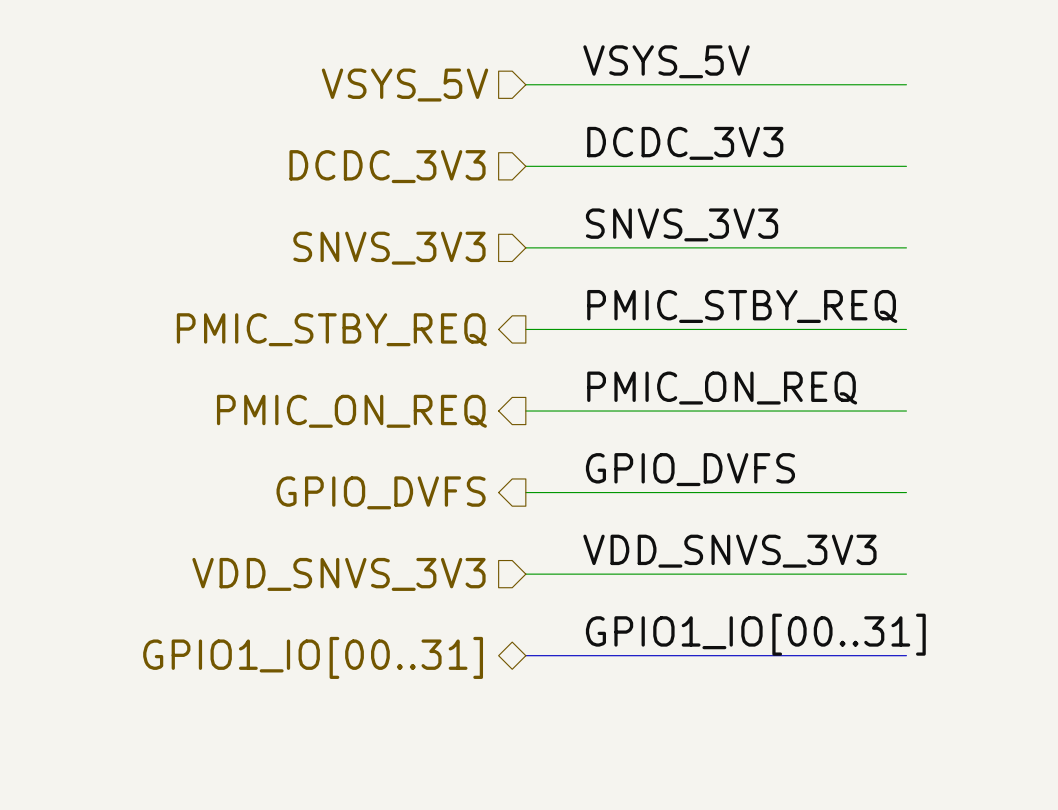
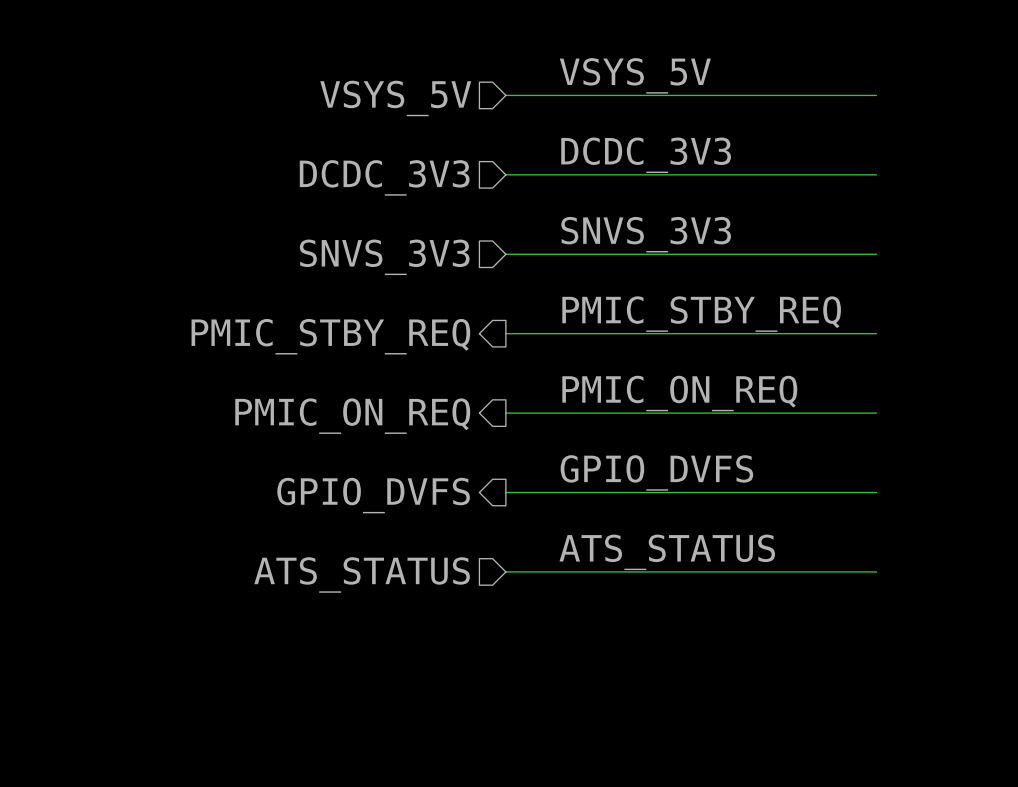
label: VDD_SNVS_3V3 (729, 551) -> ATS_STATUS (667, 552)
hierarchical label: VDD_SNVS_3V3 (338, 574) -> ATS_STATUS (362, 574)
label: GPIO1_IO[00..31] (755, 634) -> none
bus: (525, 655) (906, 655) -> none
hierarchical label: GPIO1_IO[00..31] (313, 657) -> none

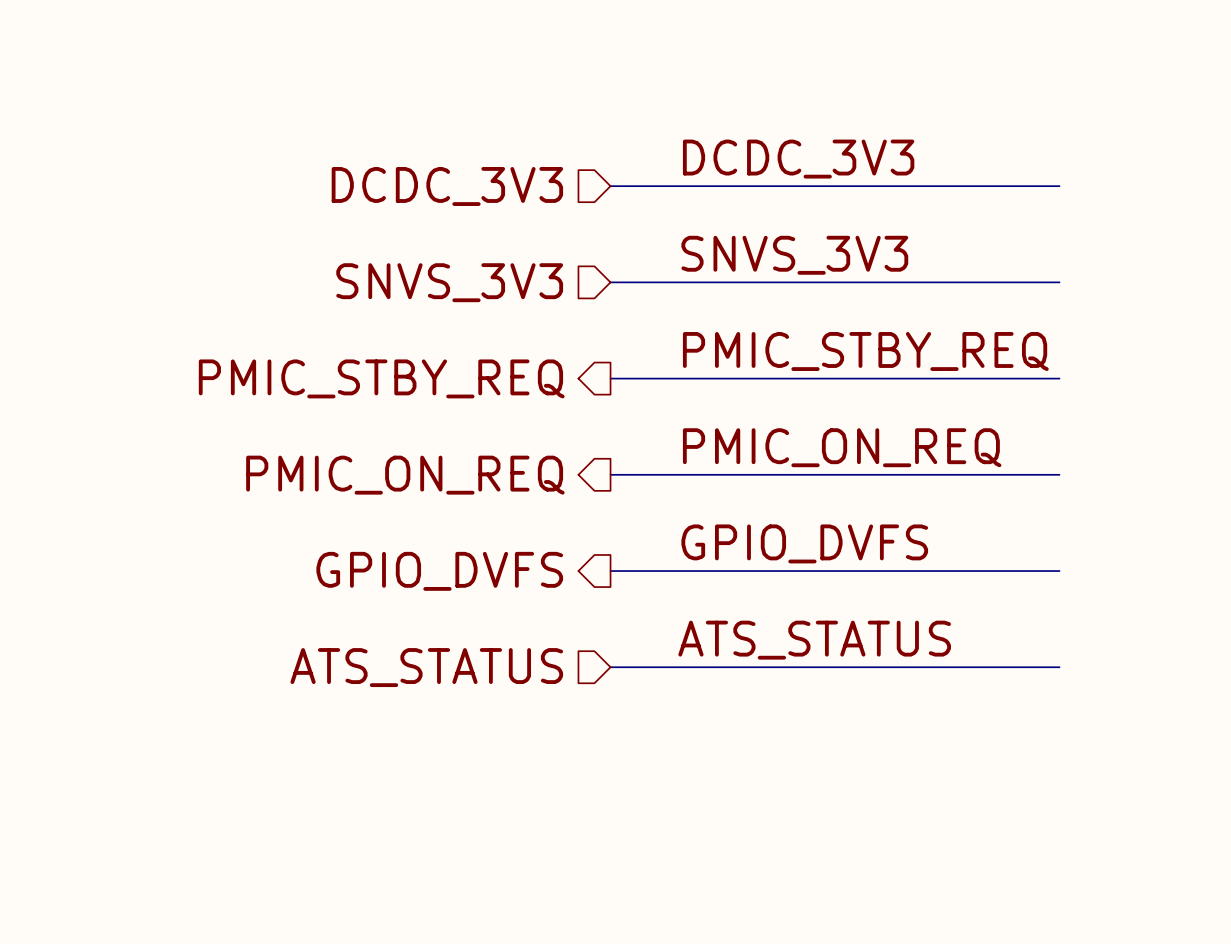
label: VSYS_5V (635, 75) -> none
wire: (505, 95) (876, 95) -> none
hierarchical label: VSYS_5V (395, 98) -> none

